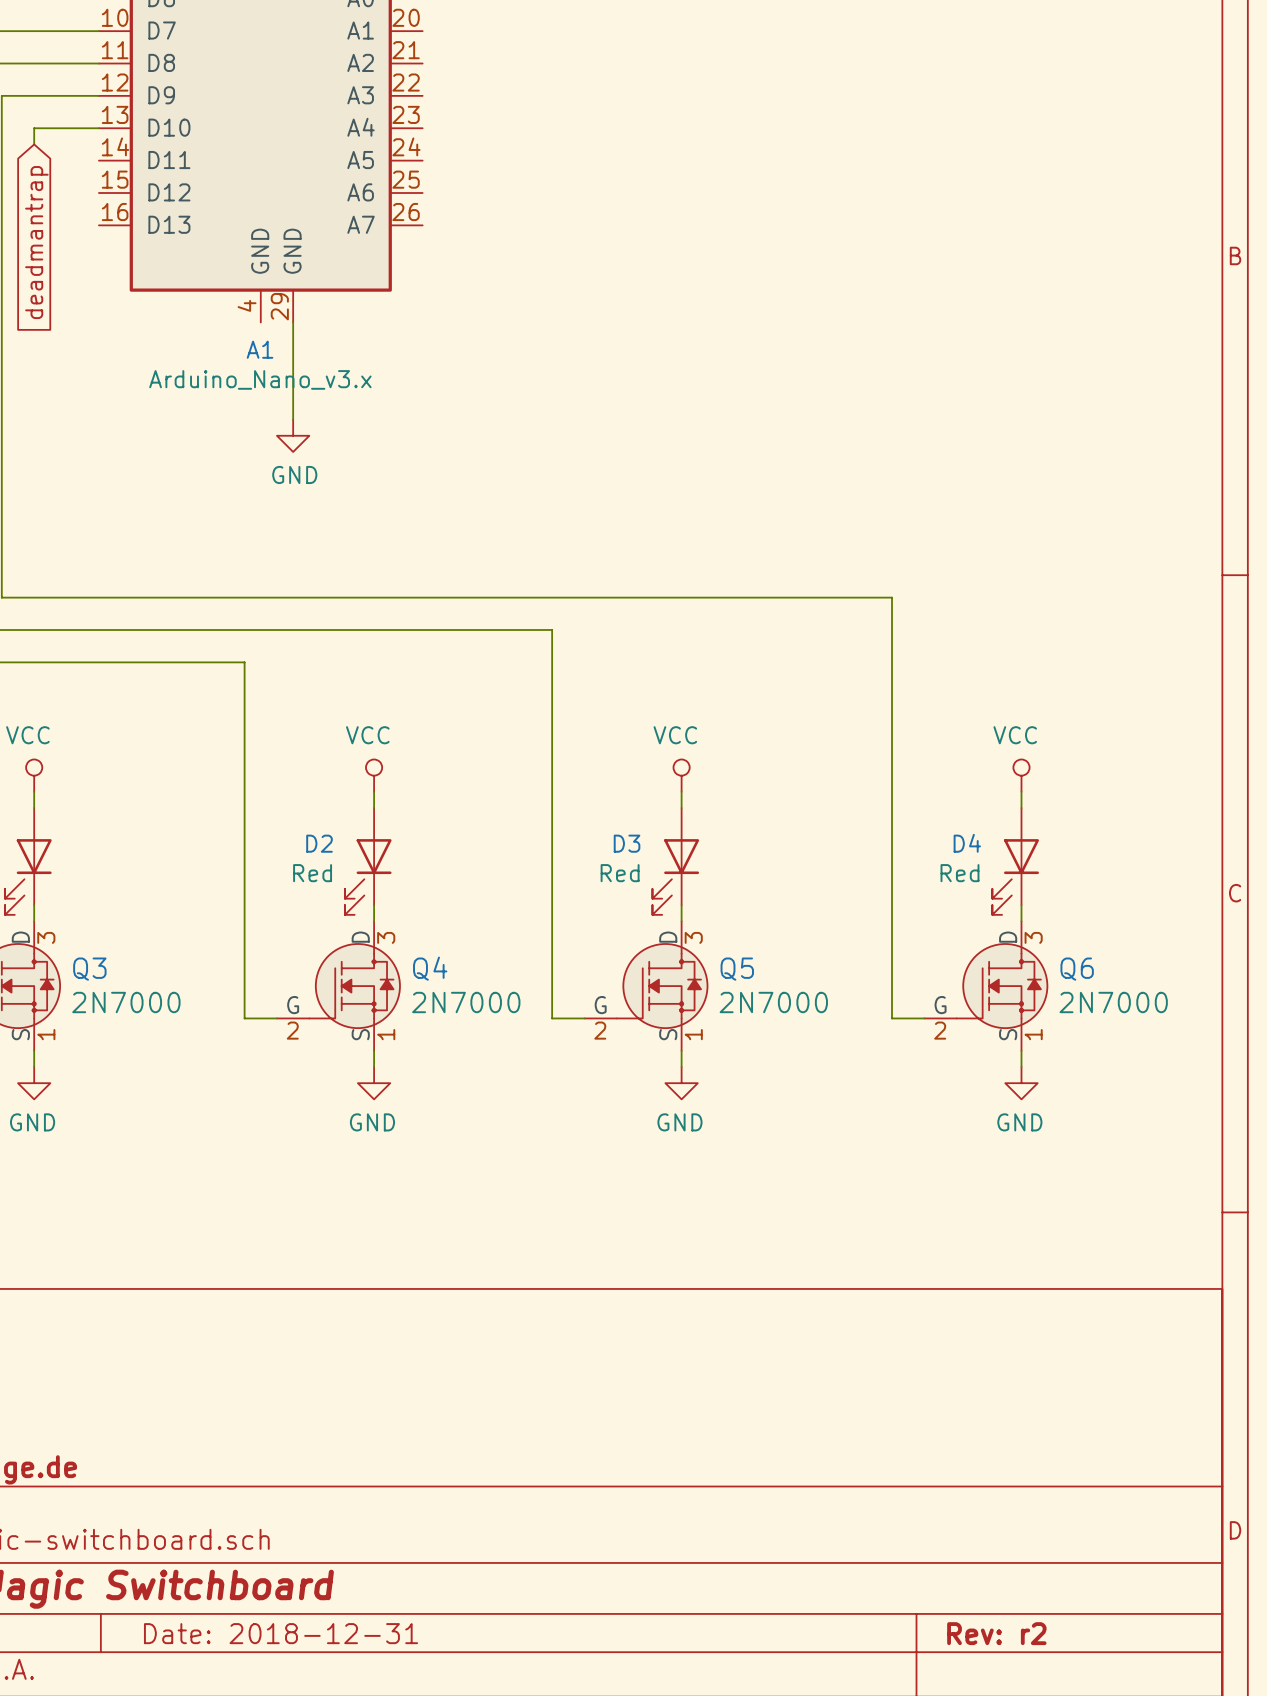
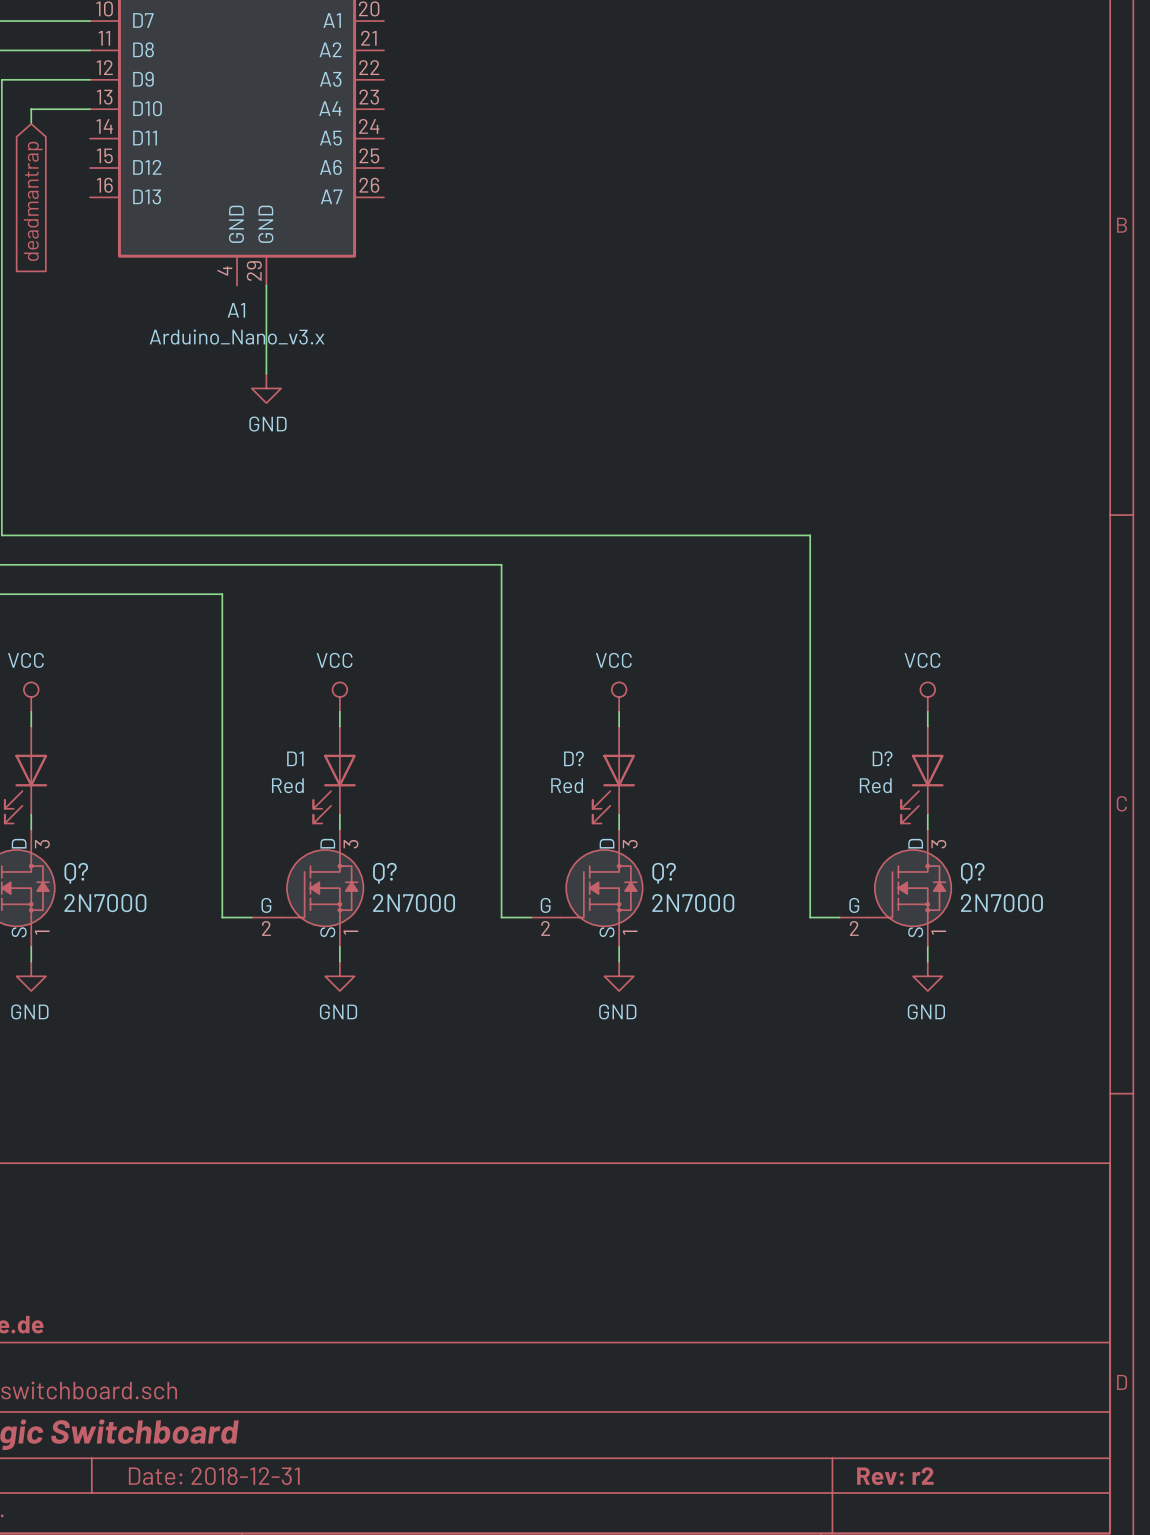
D2 name: D2 (319, 843) -> D1 (295, 758)
D3 name: D3 (627, 843) -> D? (573, 758)
D4 name: D4 (967, 843) -> D? (882, 758)
Q4 name: Q4 (430, 968) -> Q? (384, 873)
Q3 name: Q3 (89, 969) -> Q? (76, 873)
Q5 name: Q5 (737, 969) -> Q? (664, 873)
Q6 name: Q6 (1077, 969) -> Q? (972, 873)

